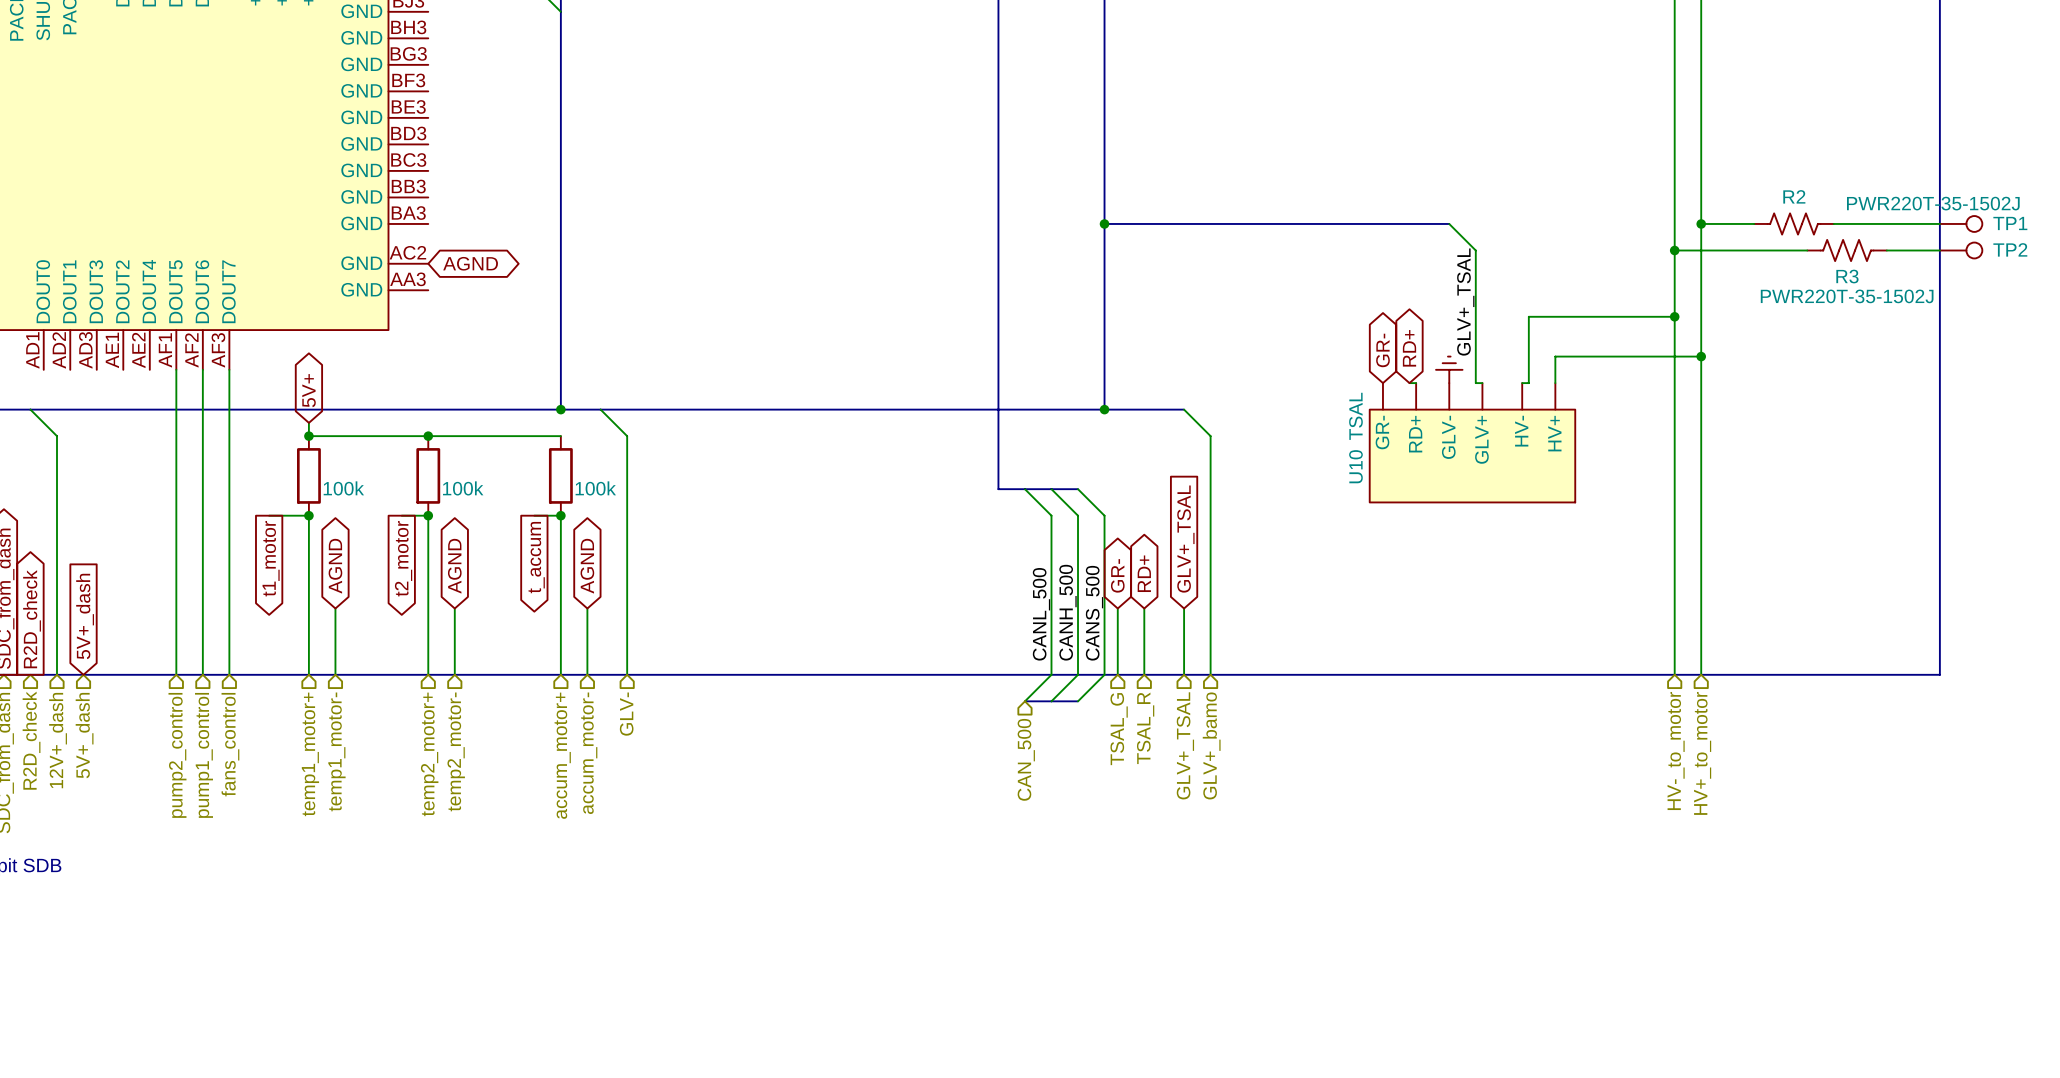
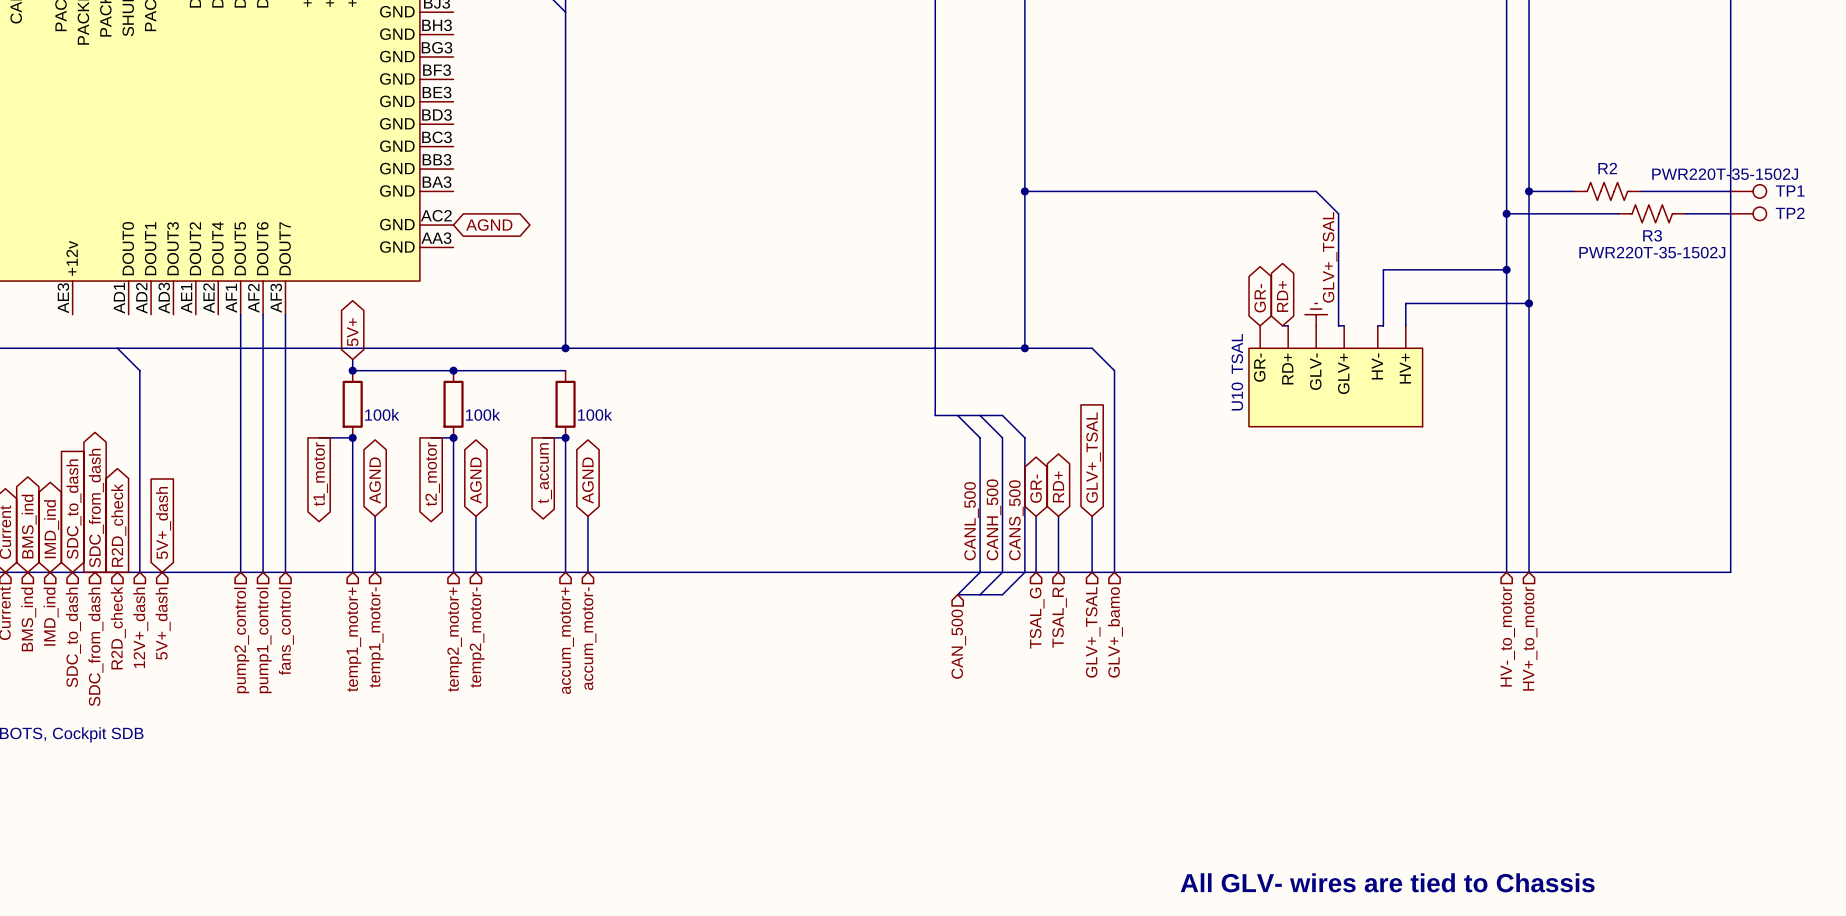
wire: (600, 409) (627, 436) (627, 674) -> none
hierarchical label: GLV- (626, 714) -> none
text: none -> All GLV- wires are tied to Chassis (1387, 882)

